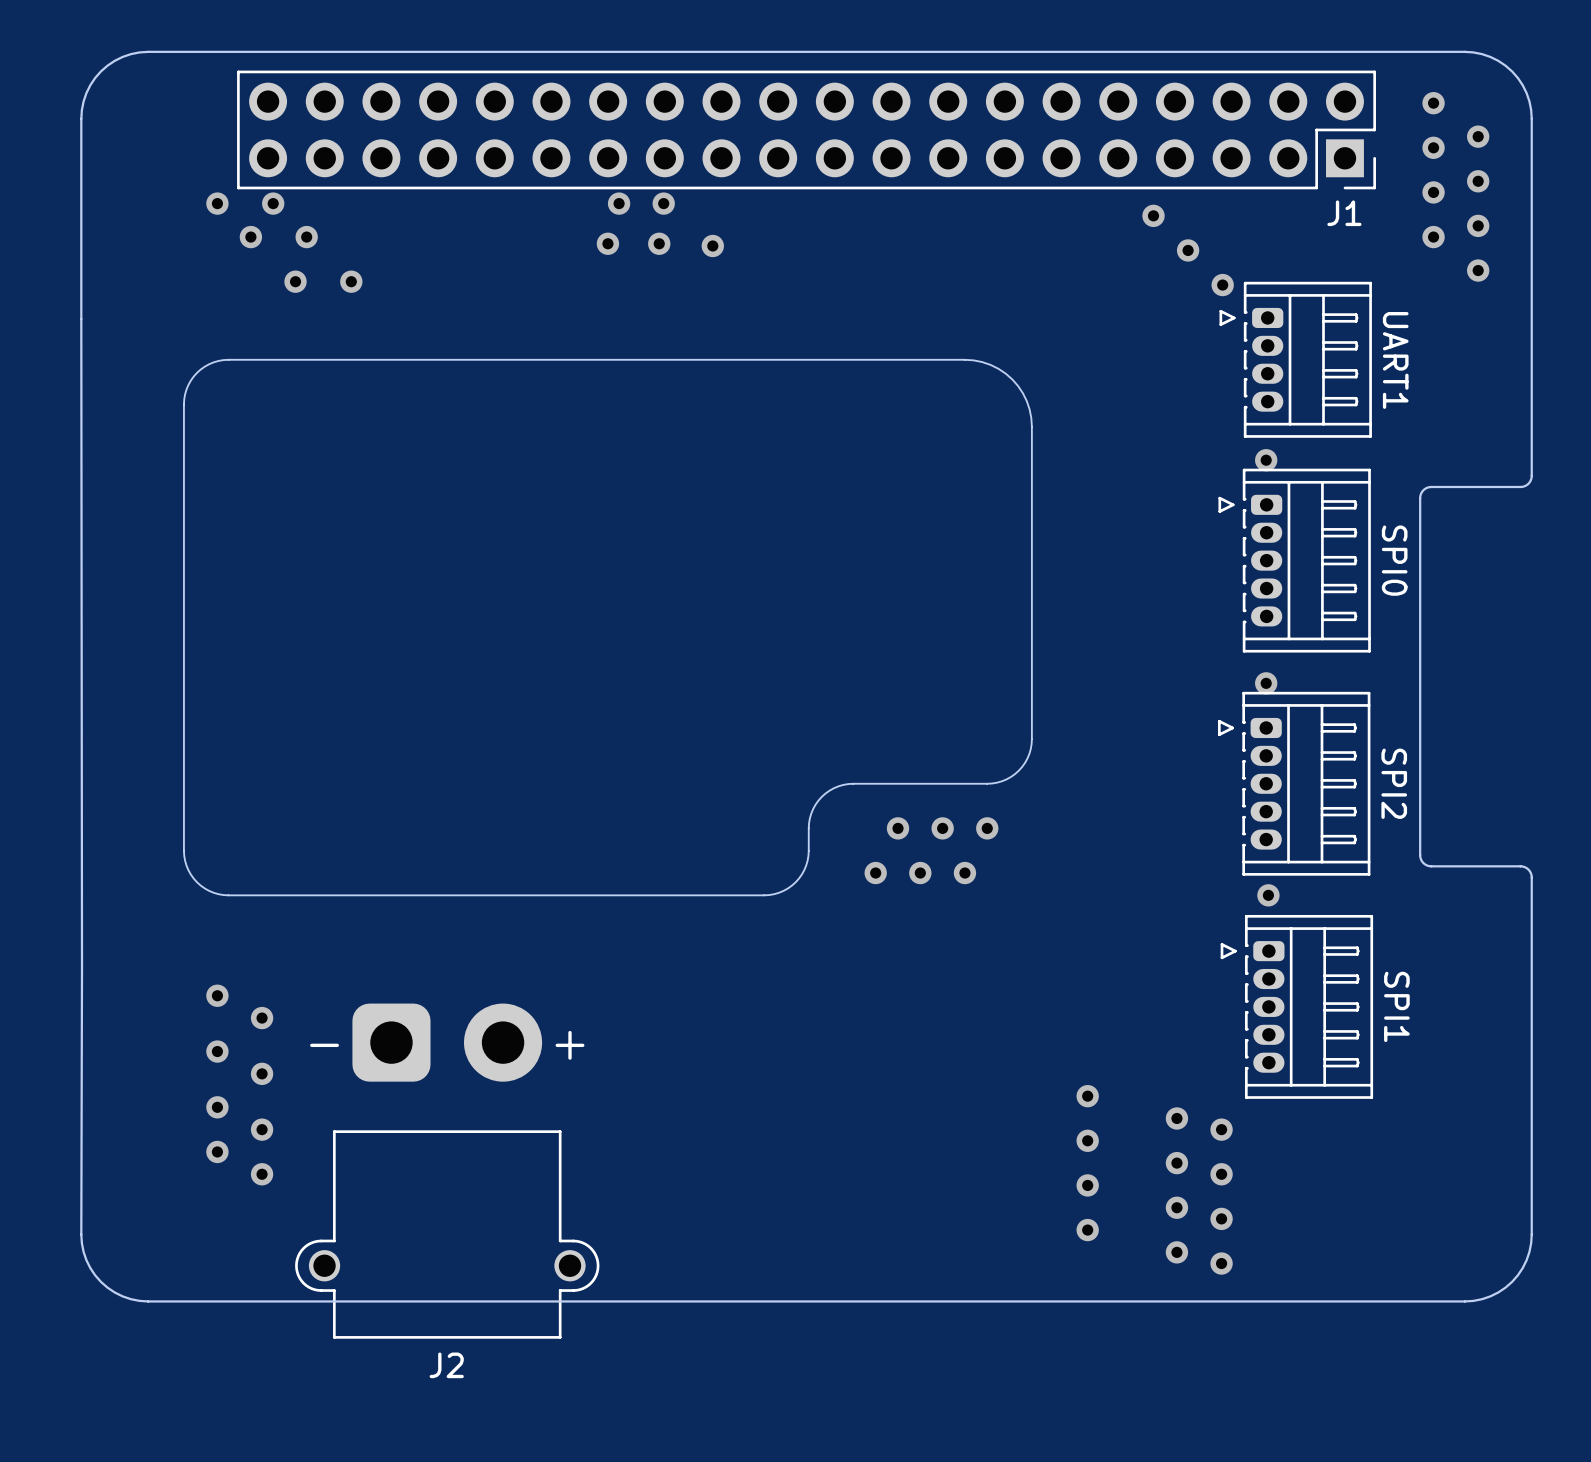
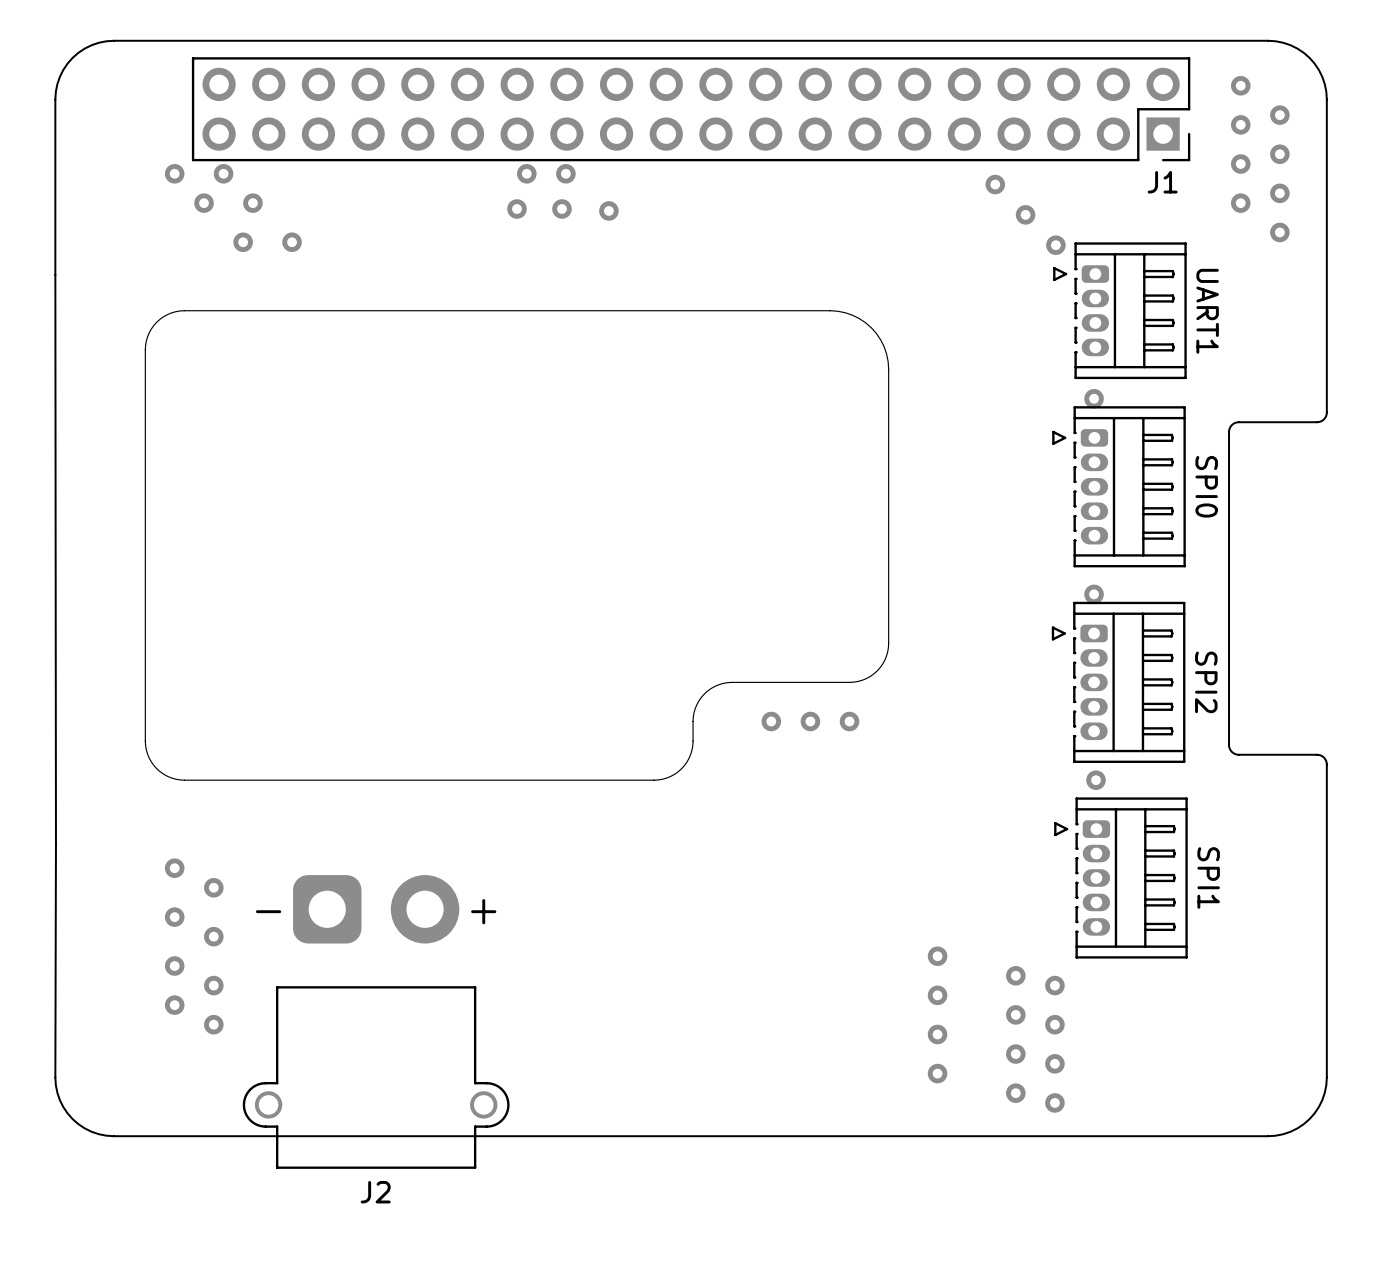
via: (875, 873) -> none
via: (920, 873) -> none
via: (964, 873) -> none

